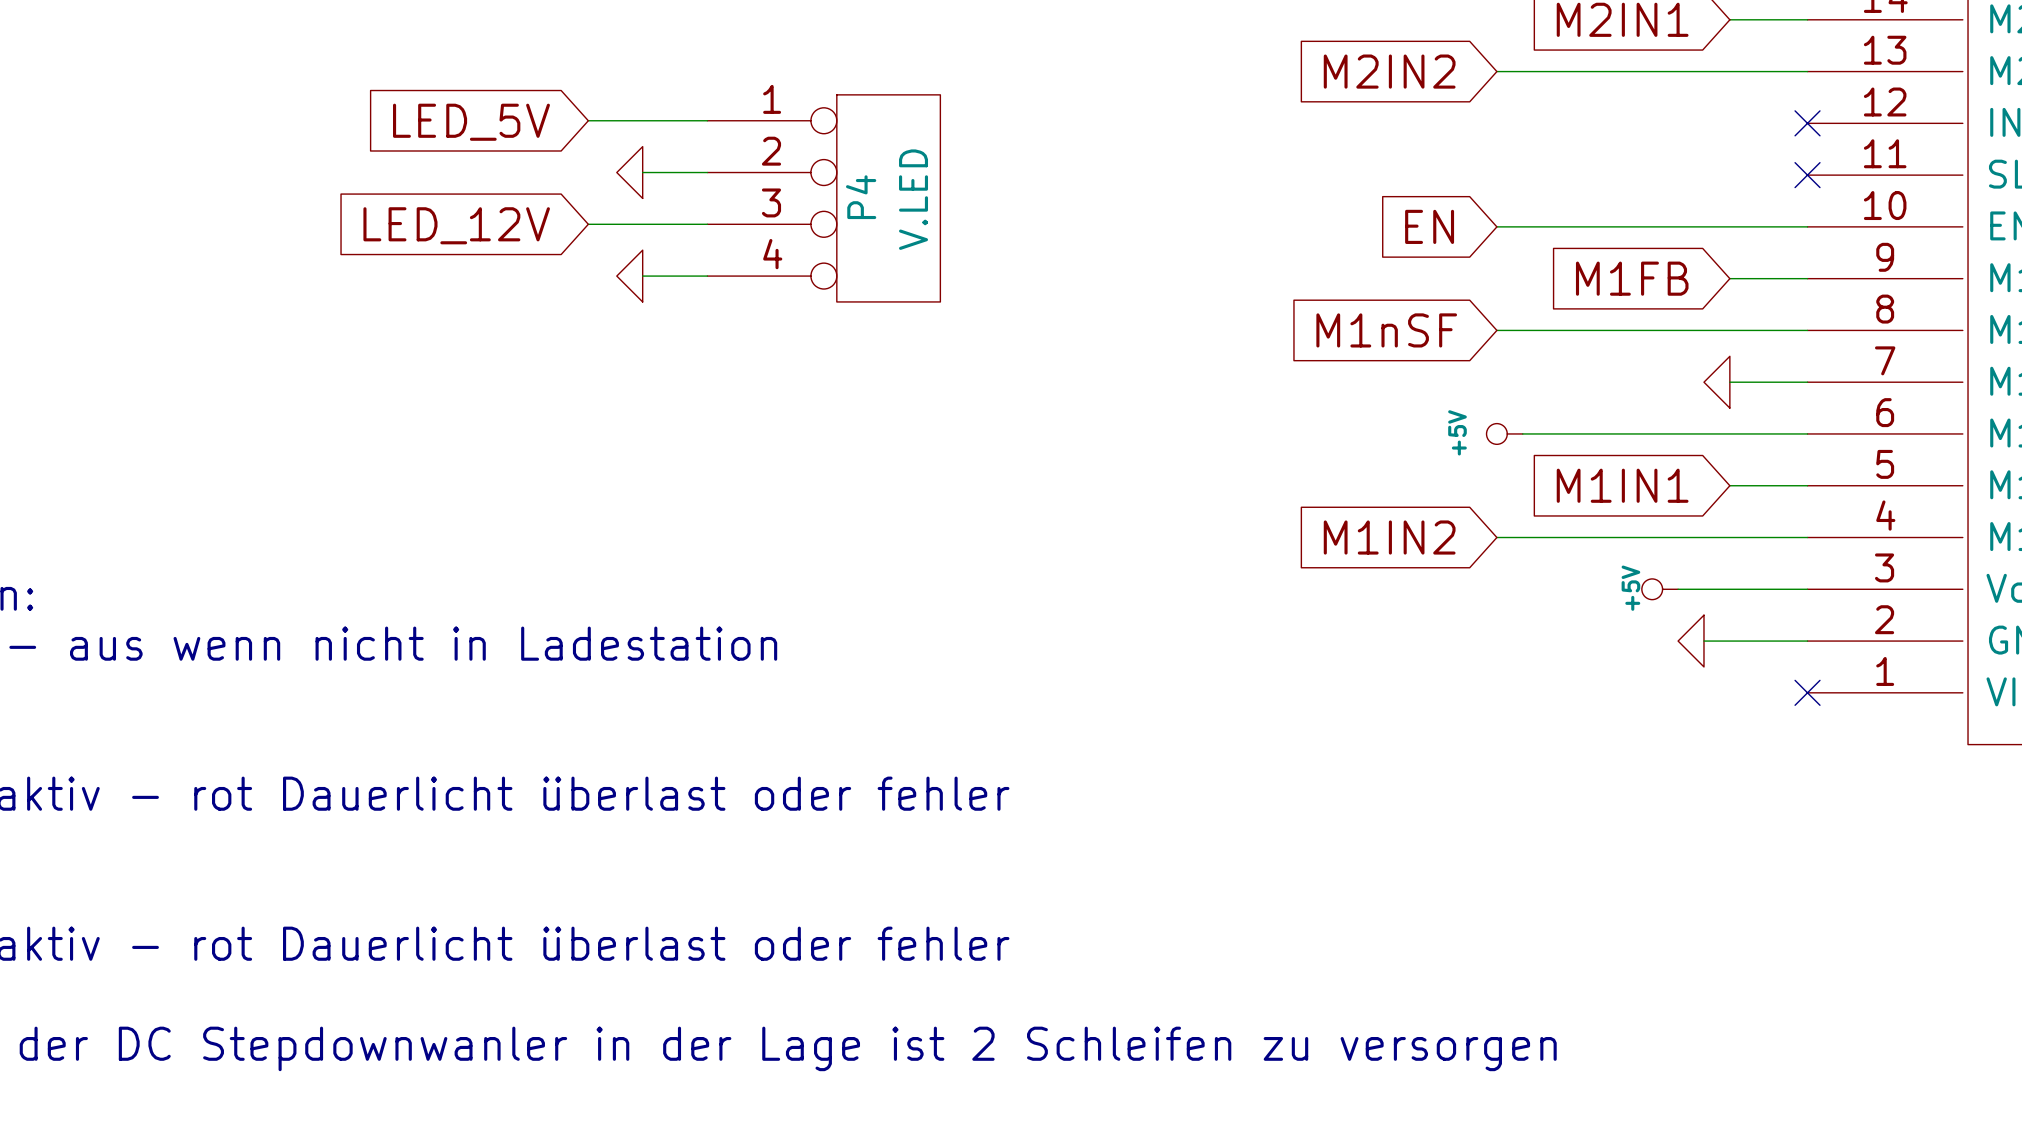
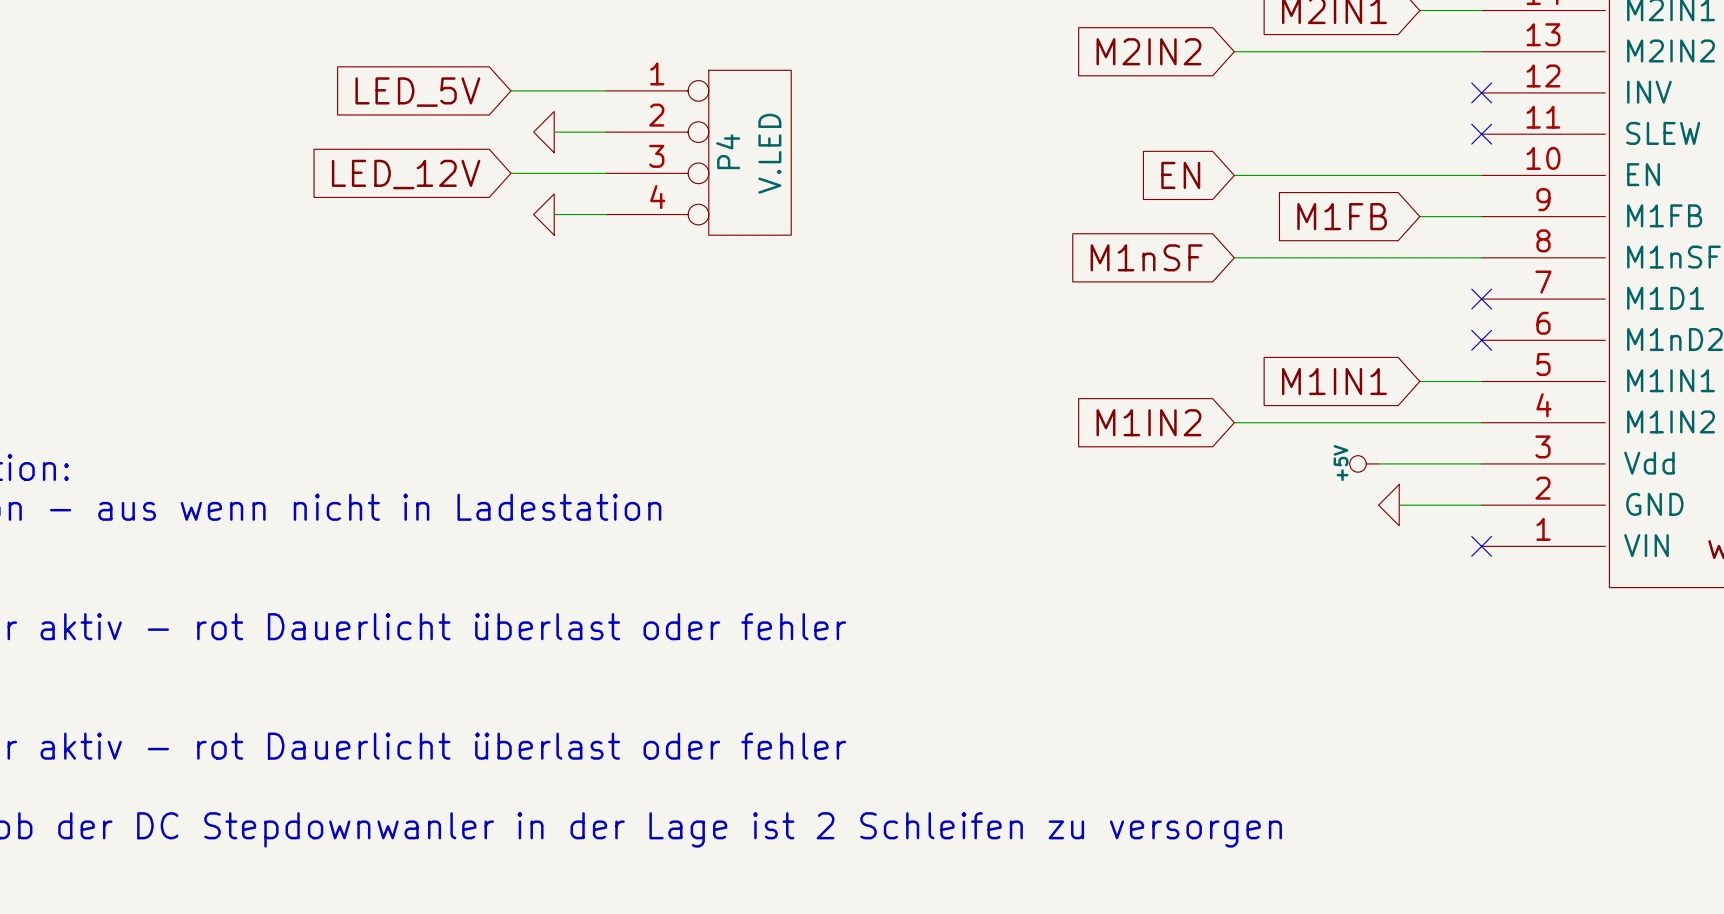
power symbol: (1716, 382) -> none
wire: (1729, 382) (1807, 382) -> none
no-connect mark: none -> (1481, 299)
power symbol: +5V (1504, 433) -> none
wire: (1522, 433) (1807, 433) -> none
no-connect mark: none -> (1481, 340)

